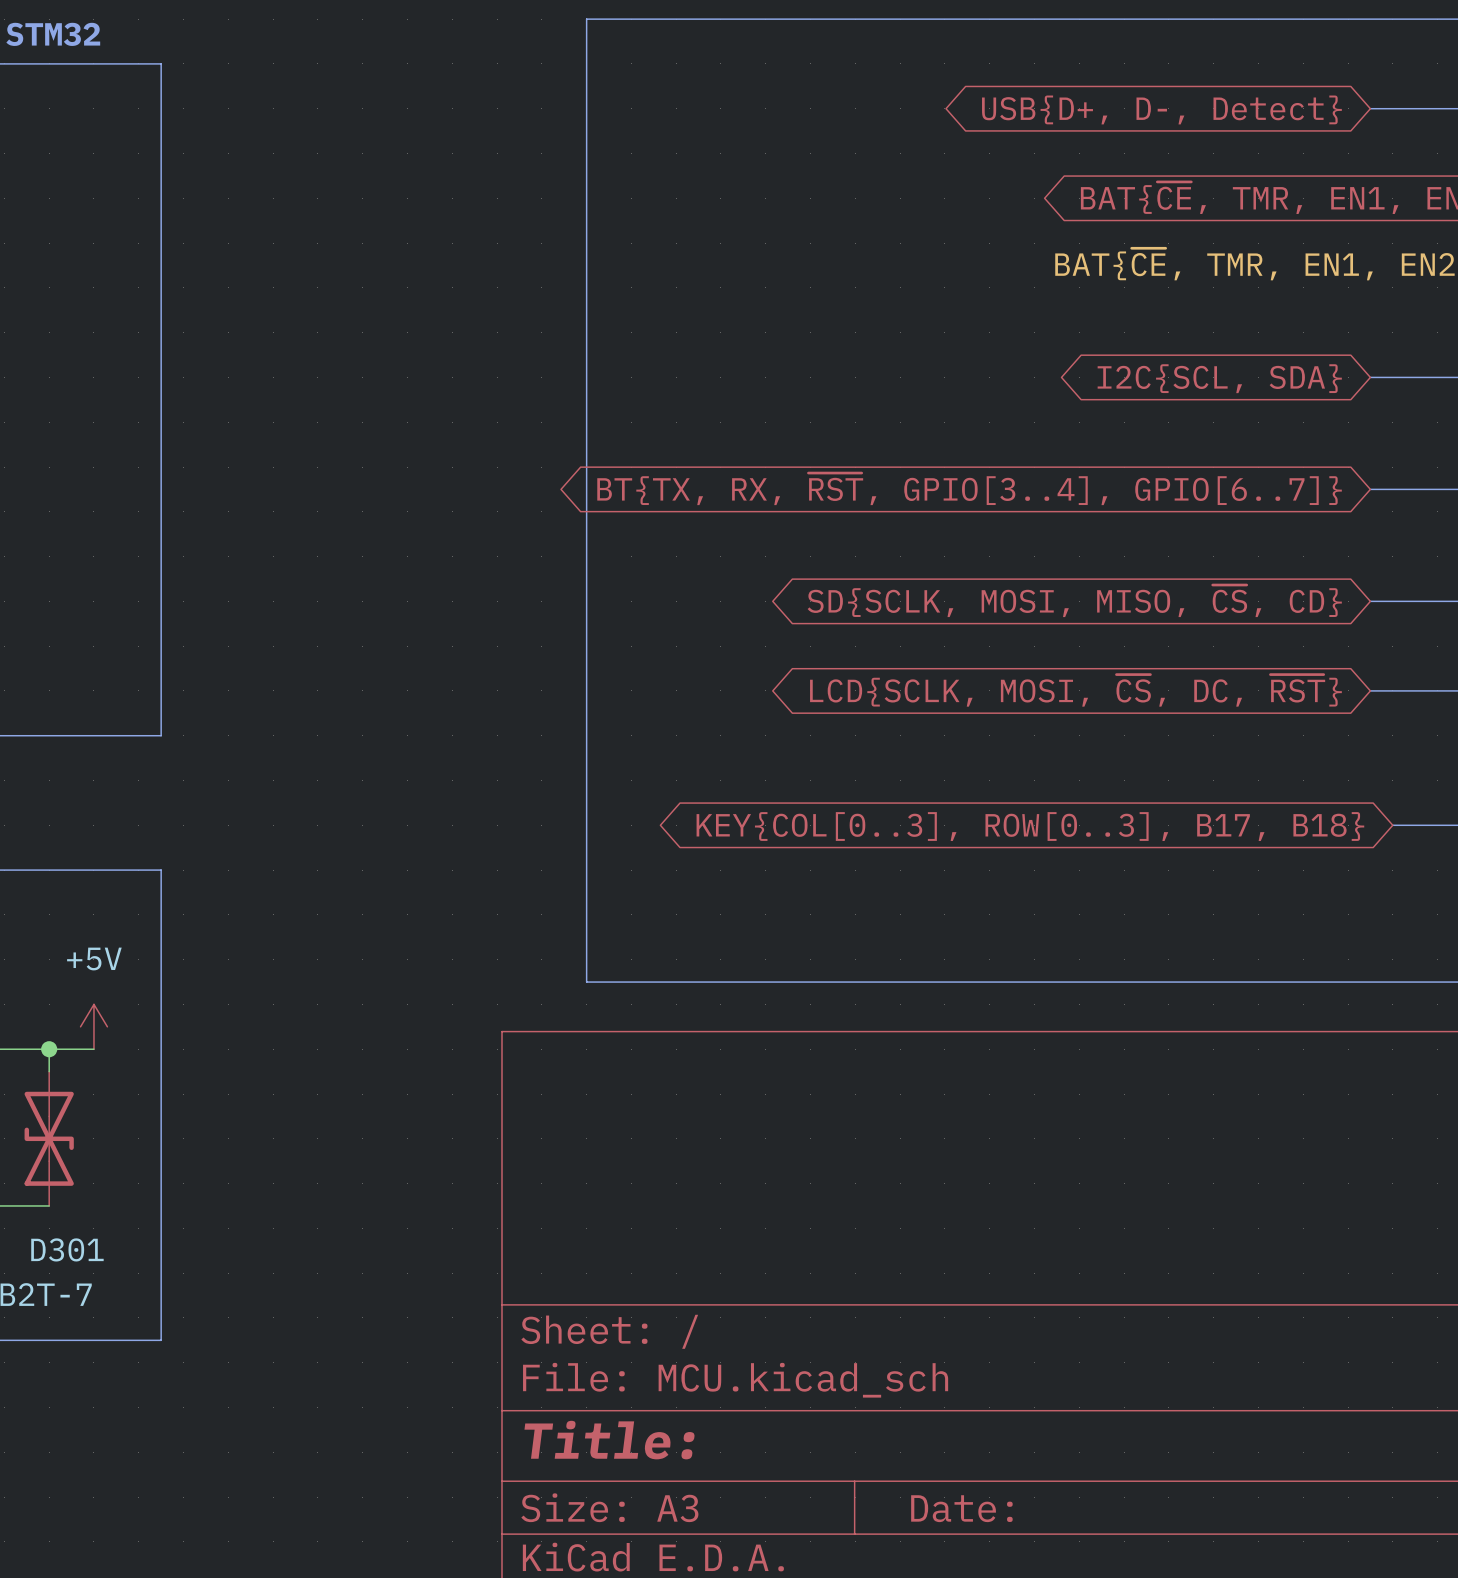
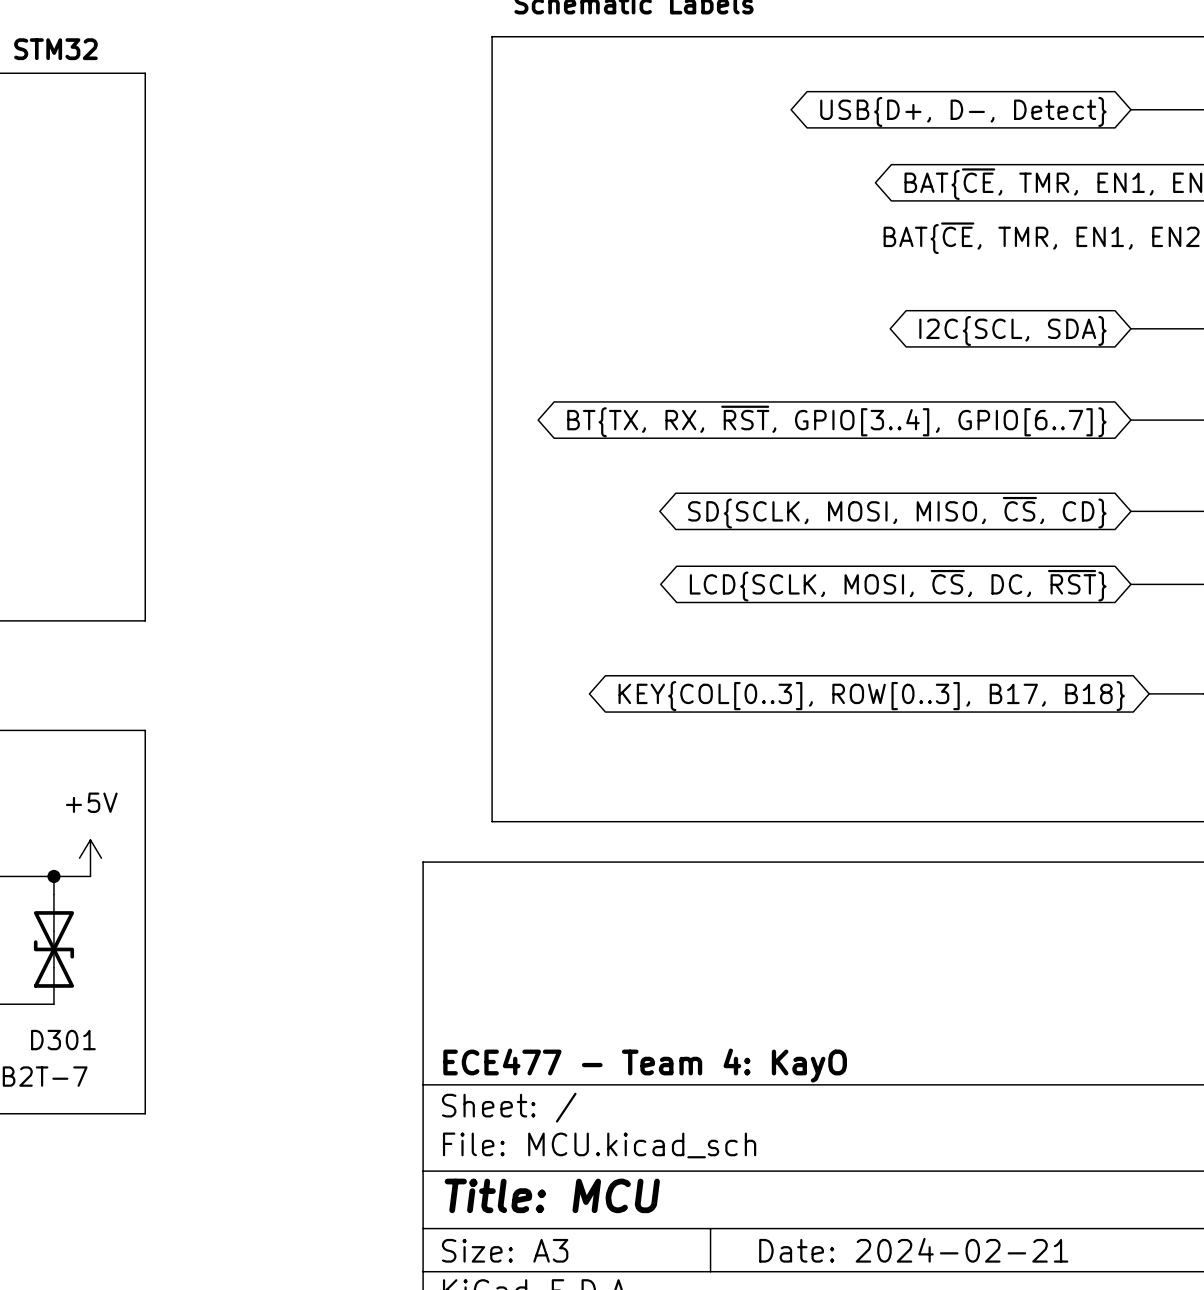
title block: none -> ECE477 - Team 4: KayO (645, 1065)
title block: Title: (609, 1440) -> Title: MCU (552, 1195)
title block: Date: (961, 1508) -> Date: 2024-02-21 (913, 1250)

